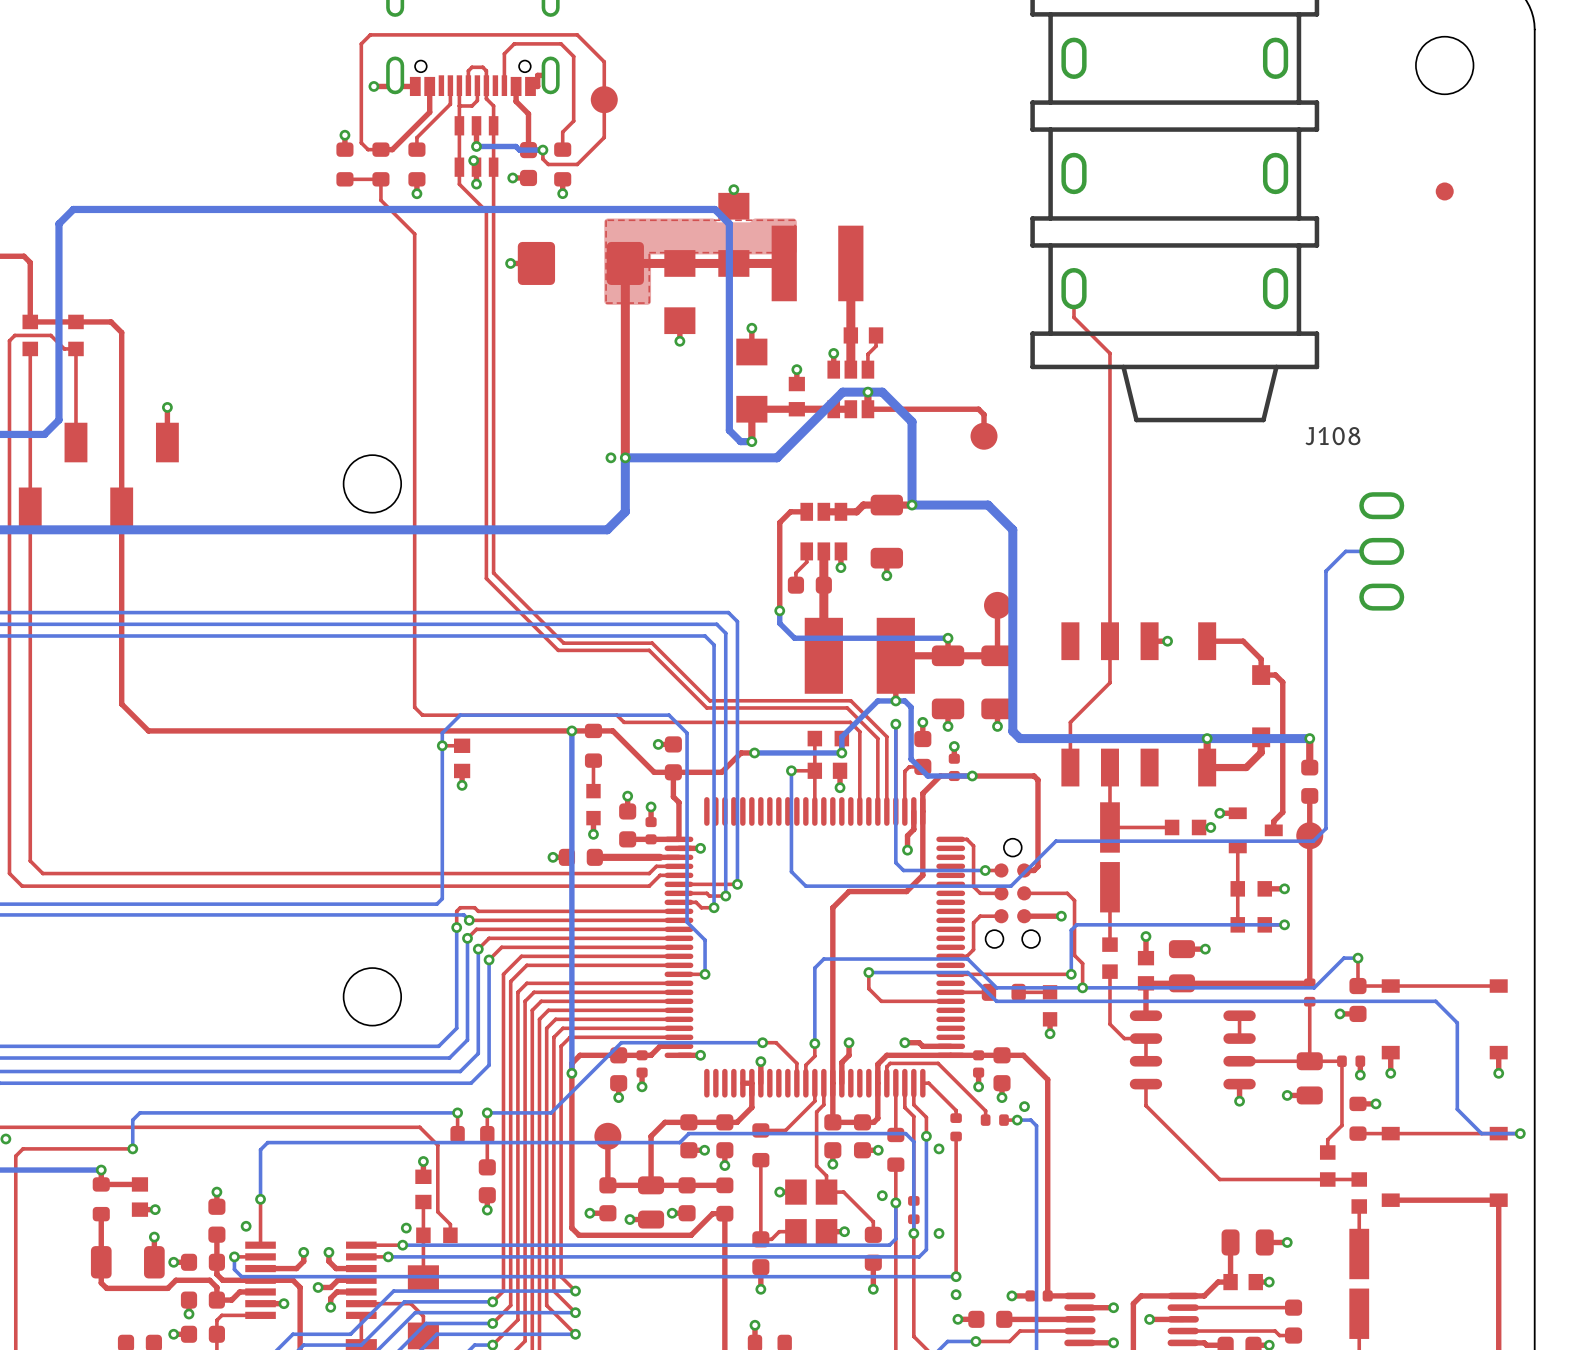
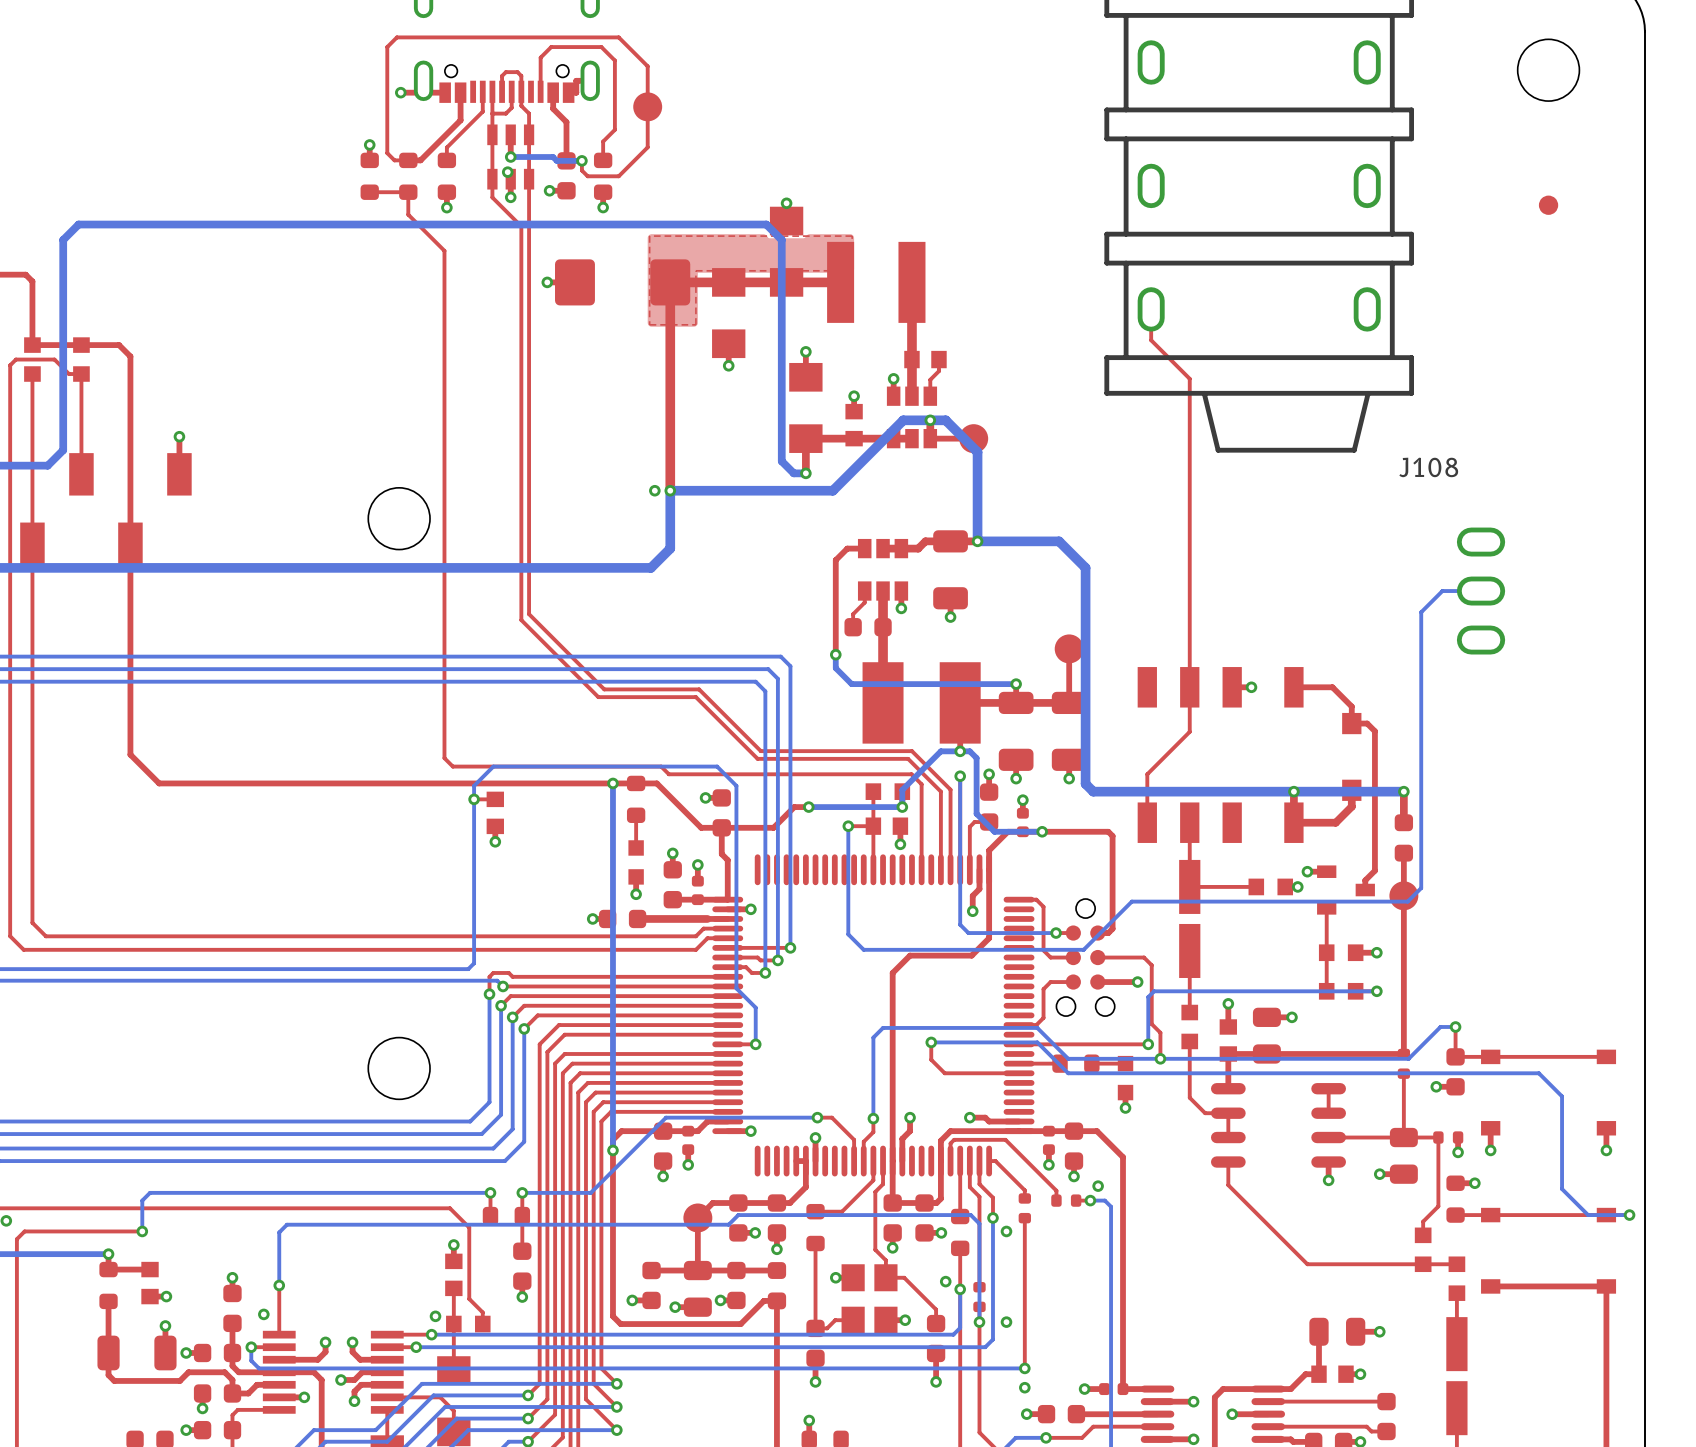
top track: (908, 409) (978, 409) (984, 414) (984, 436) -> none
part position: (984, 436) -> (973, 438)
top track: (607, 1136) (607, 1185) -> none
part position: (607, 1136) -> (697, 1217)

